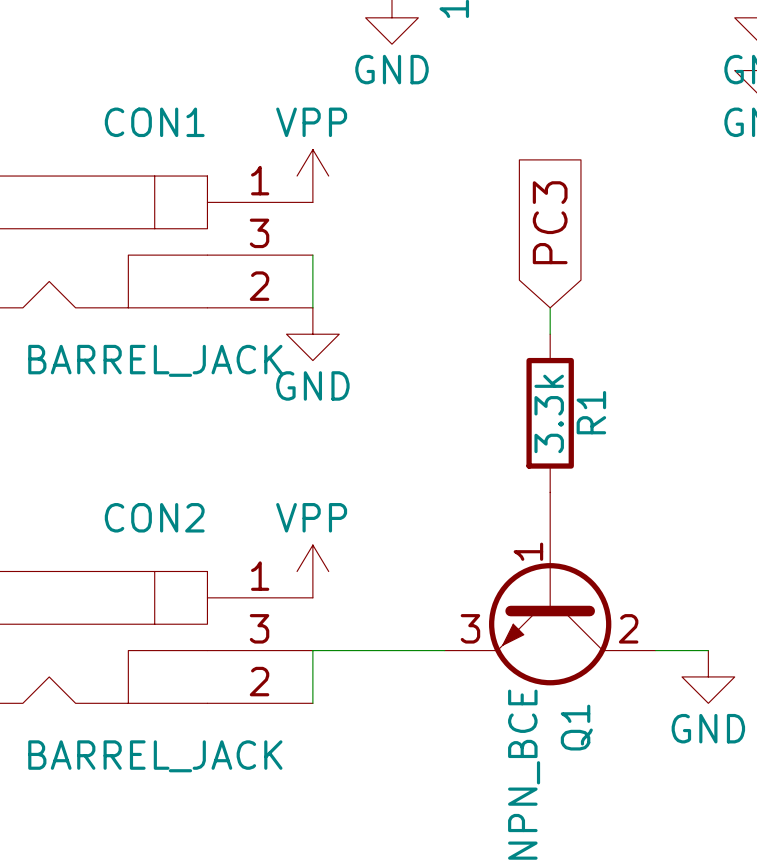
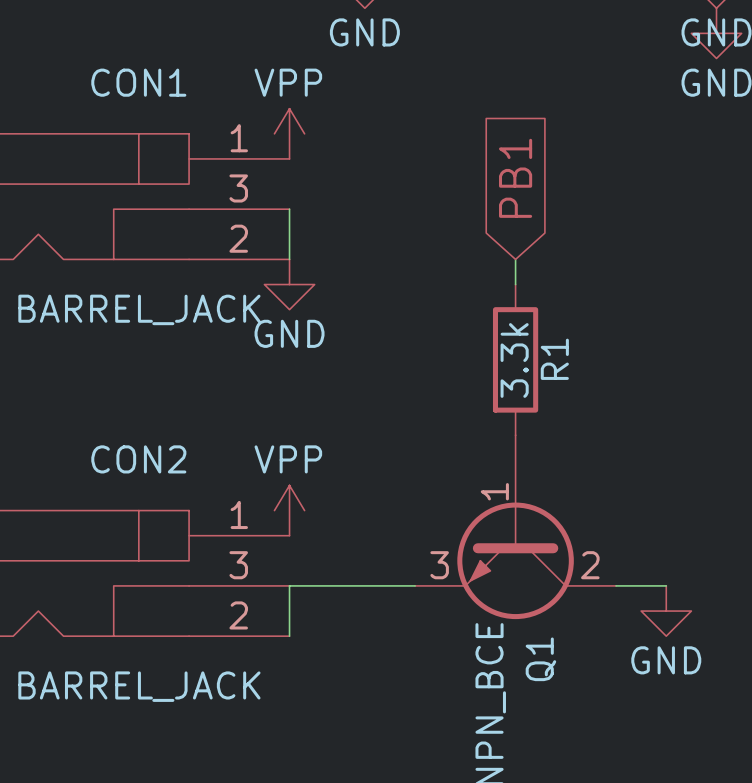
global label: PC3 (550, 222) -> PB1 (515, 178)

